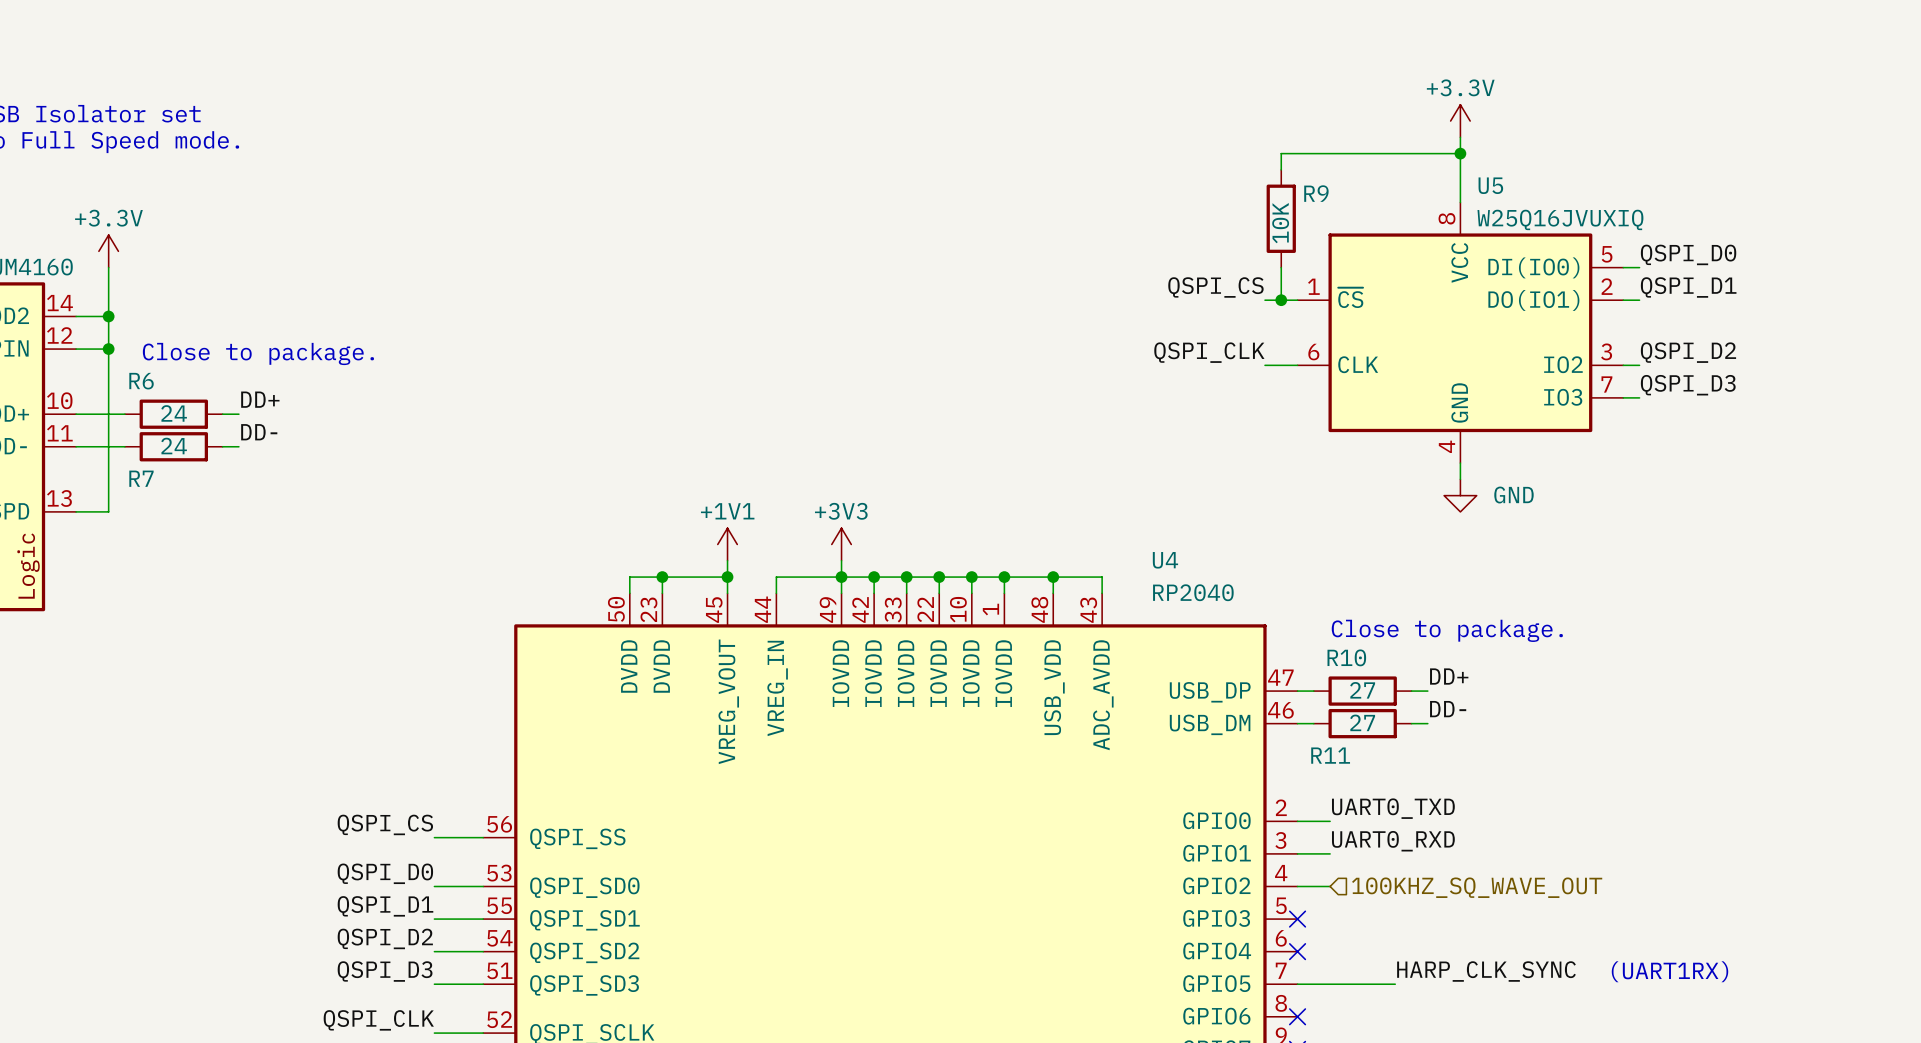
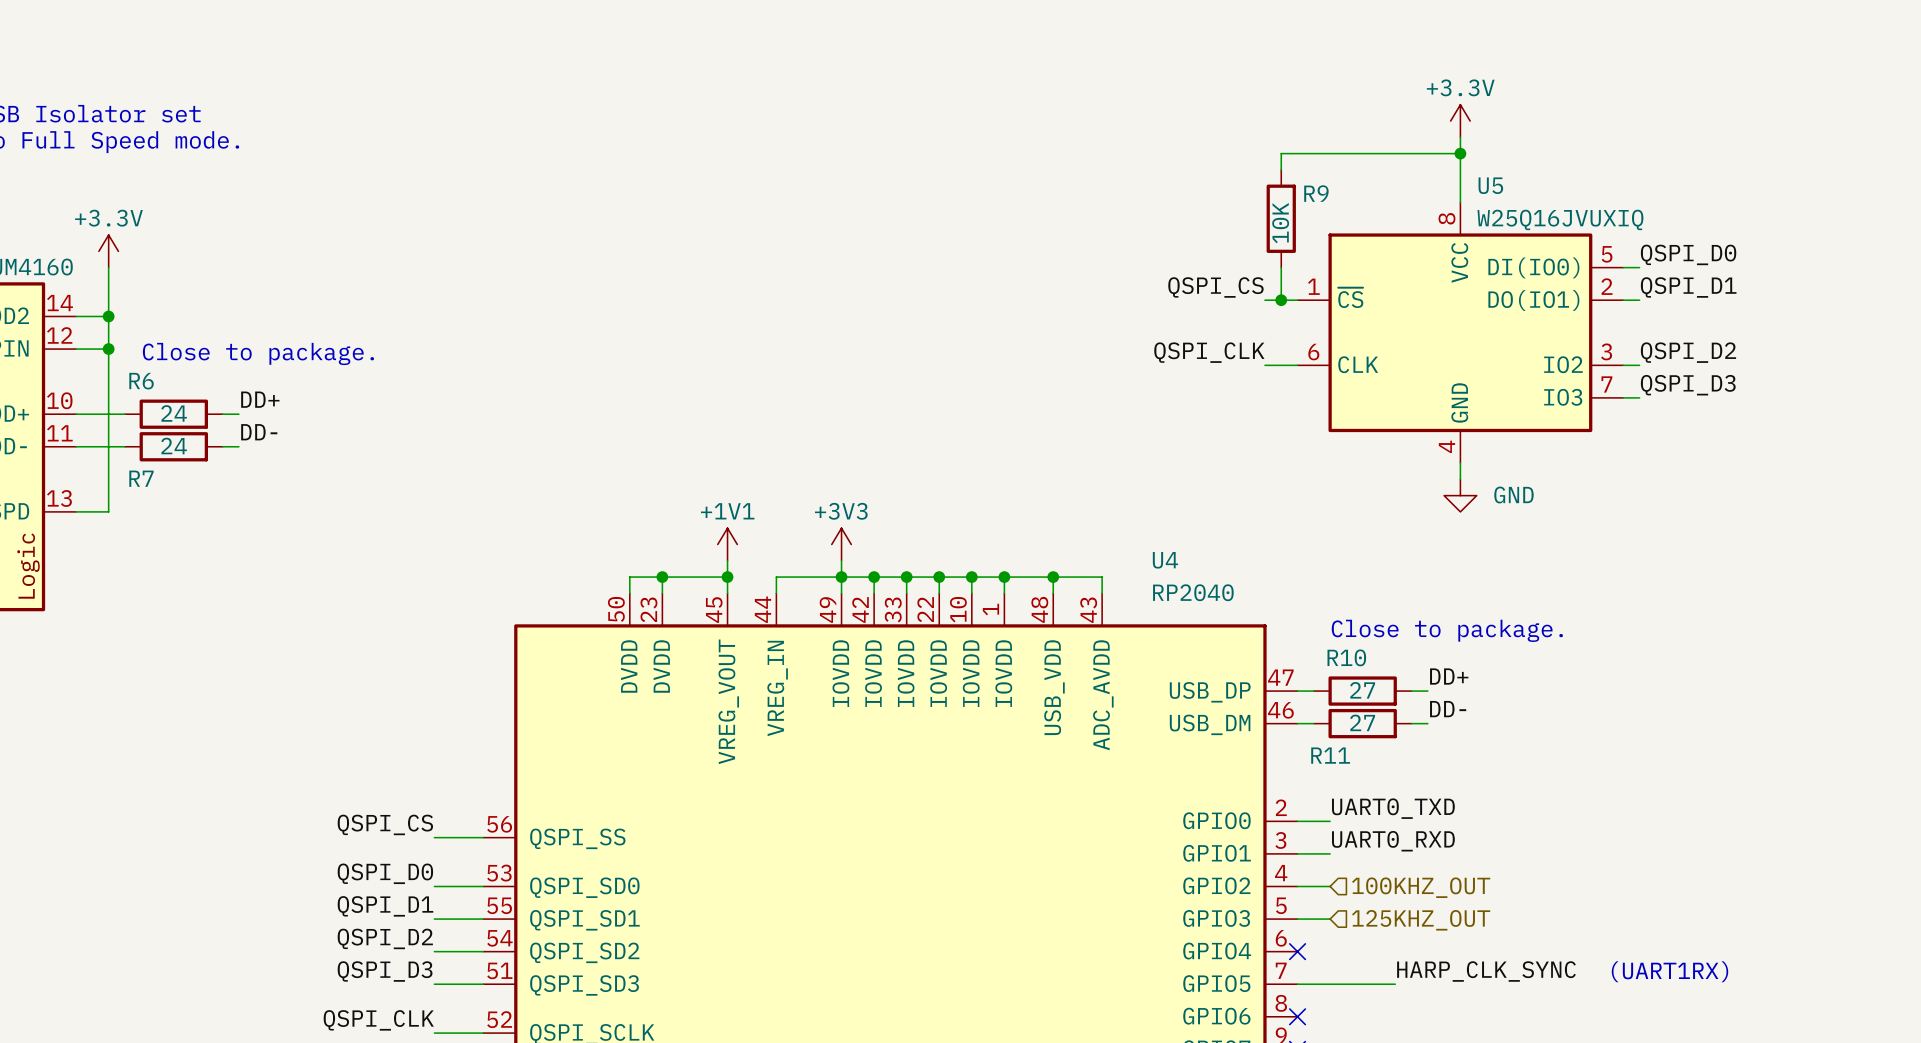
hierarchical label: 100KHZ_SQ_WAVE_OUT (1477, 887) -> 100KHZ_OUT (1421, 887)
wire: none -> (1297, 919) (1330, 919)
no-connect mark: (1297, 919) -> none
hierarchical label: none -> 125KHZ_OUT (1421, 920)

